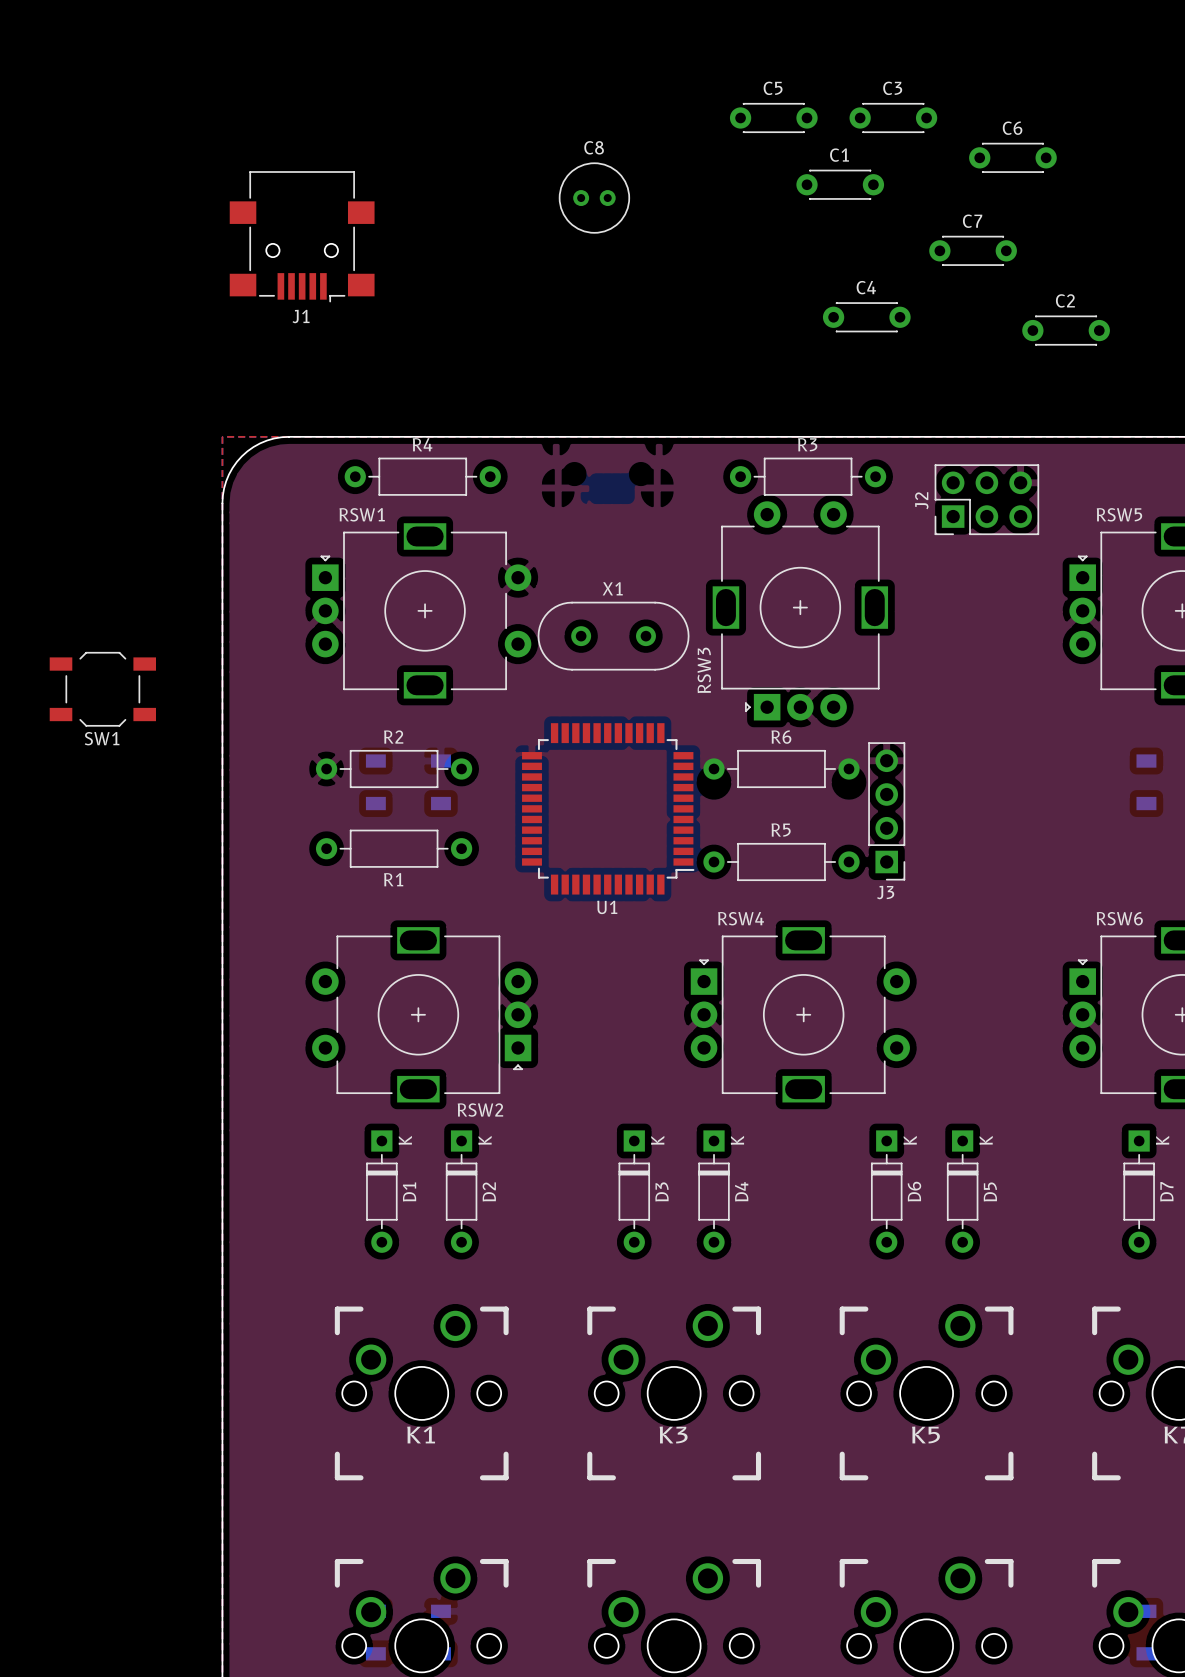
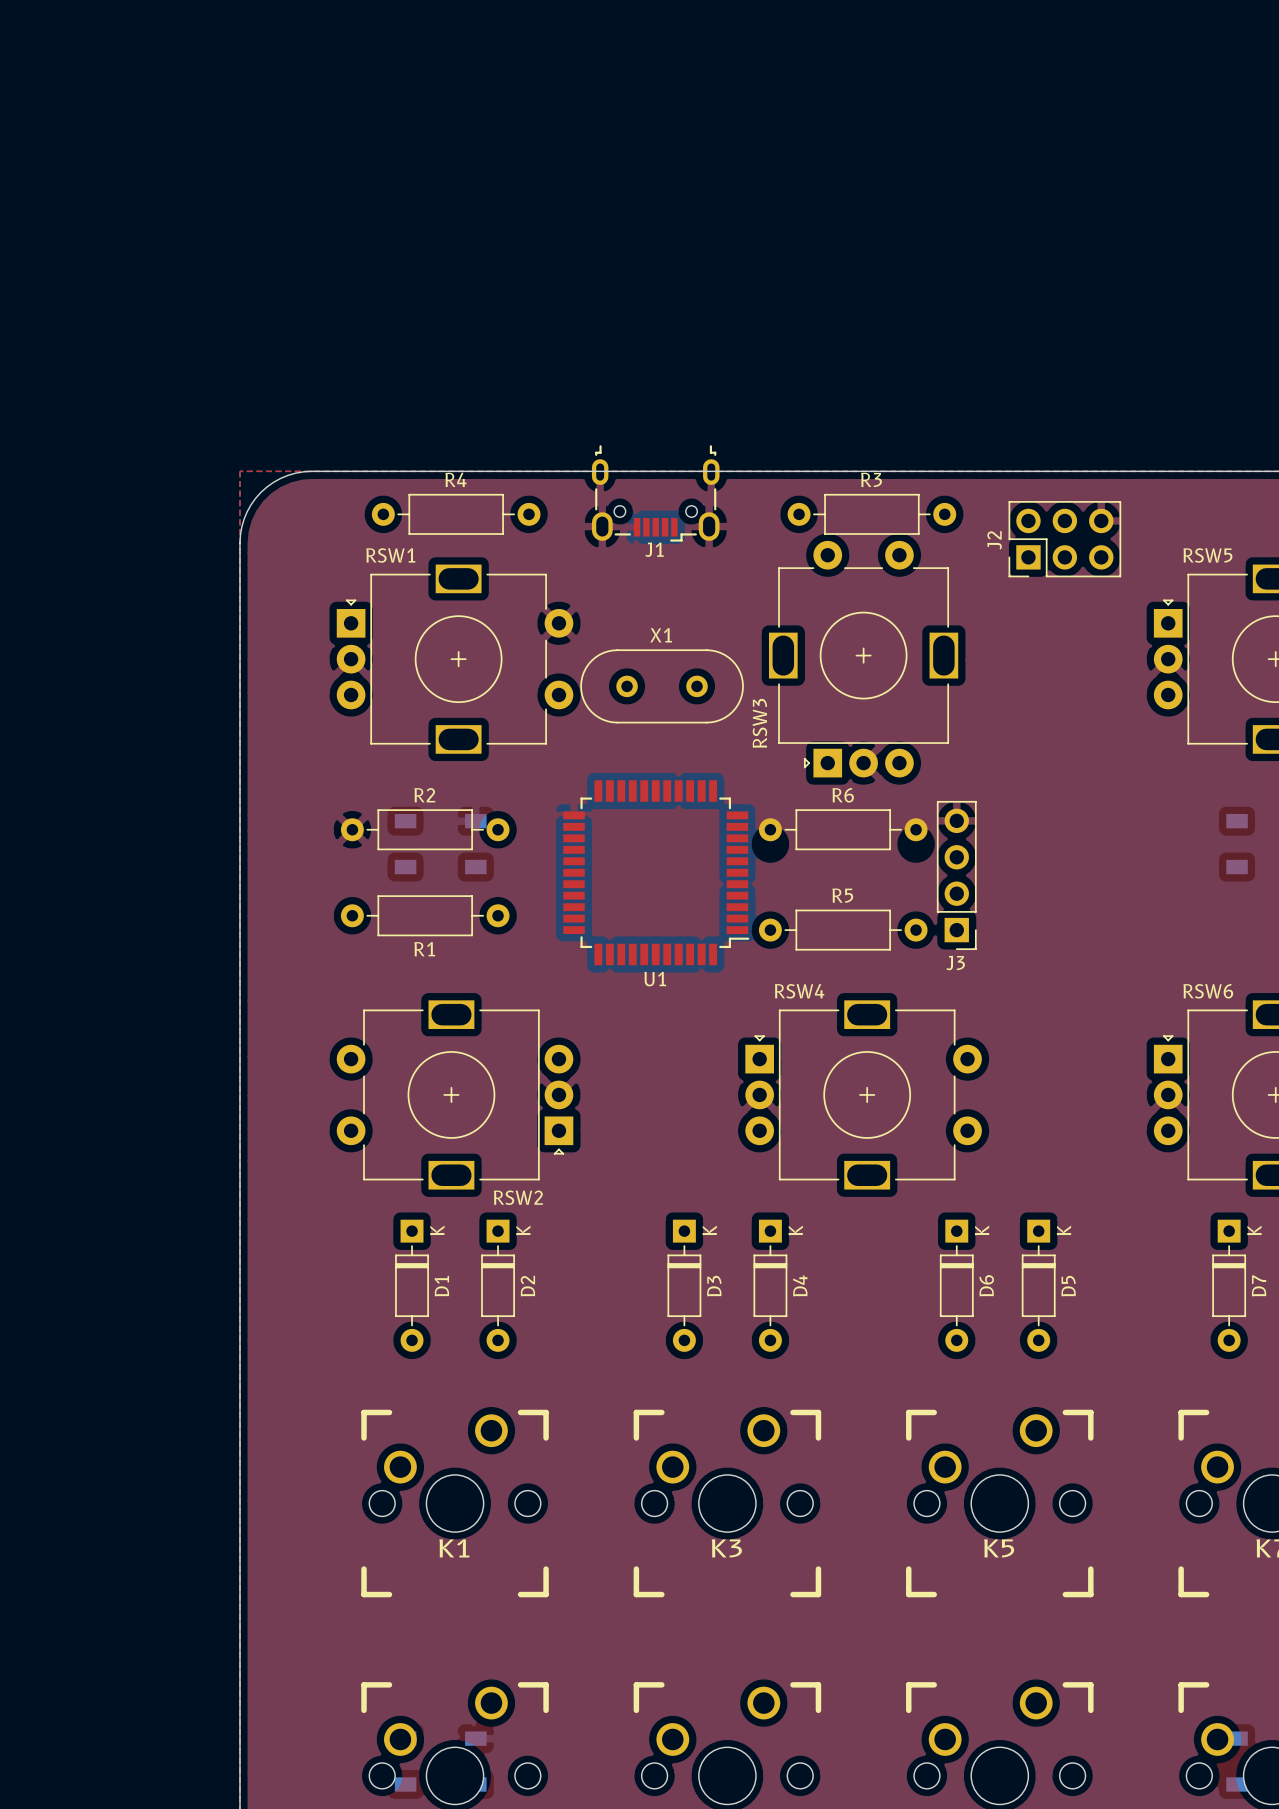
C5: (773, 117) -> none
C3: (893, 117) -> none
C6: (1012, 157) -> none
J1 footprint: [229, 171, 375, 303] -> [591, 445, 720, 542]
C1: (840, 184) -> none
C8: (594, 198) -> none
C7: (973, 250) -> none
J1 name position: J1 (301, 316) -> J1 (654, 549)
C4: (866, 317) -> none
C2: (1066, 330) -> none
SW1: (102, 689) -> none

